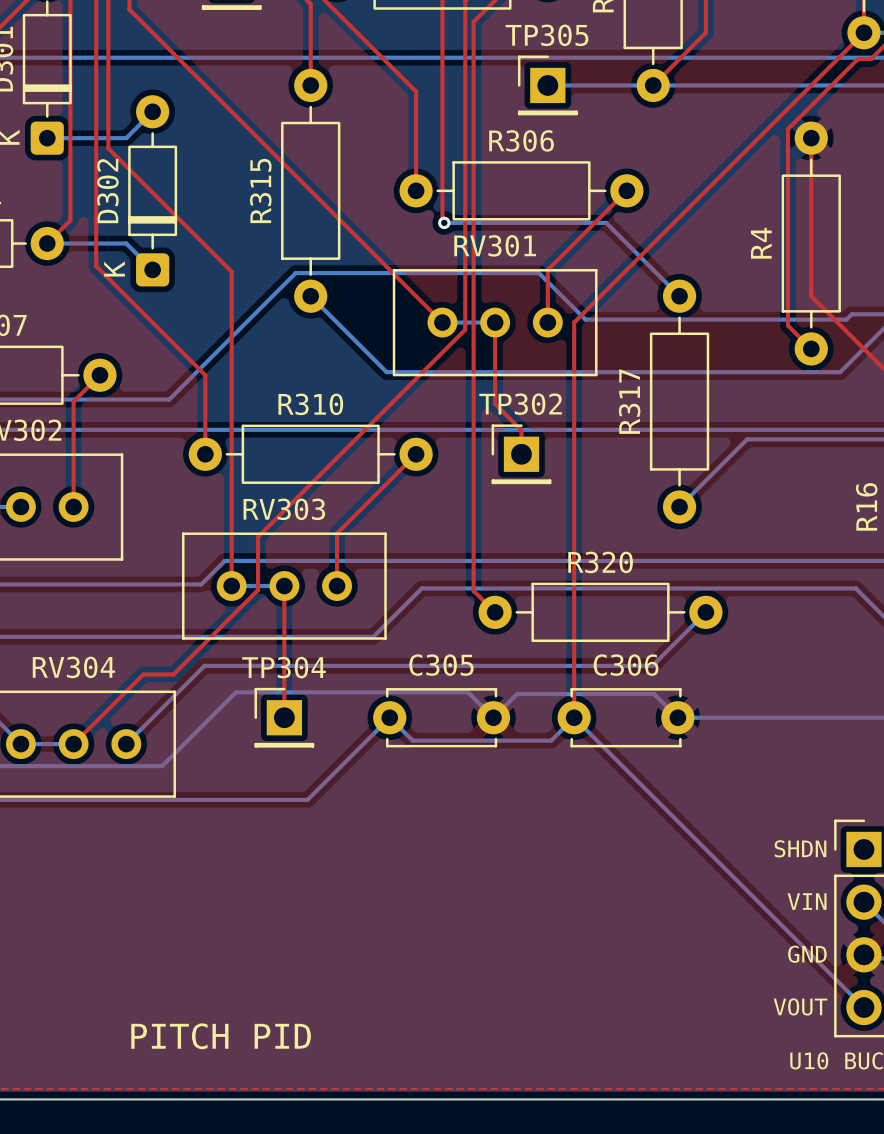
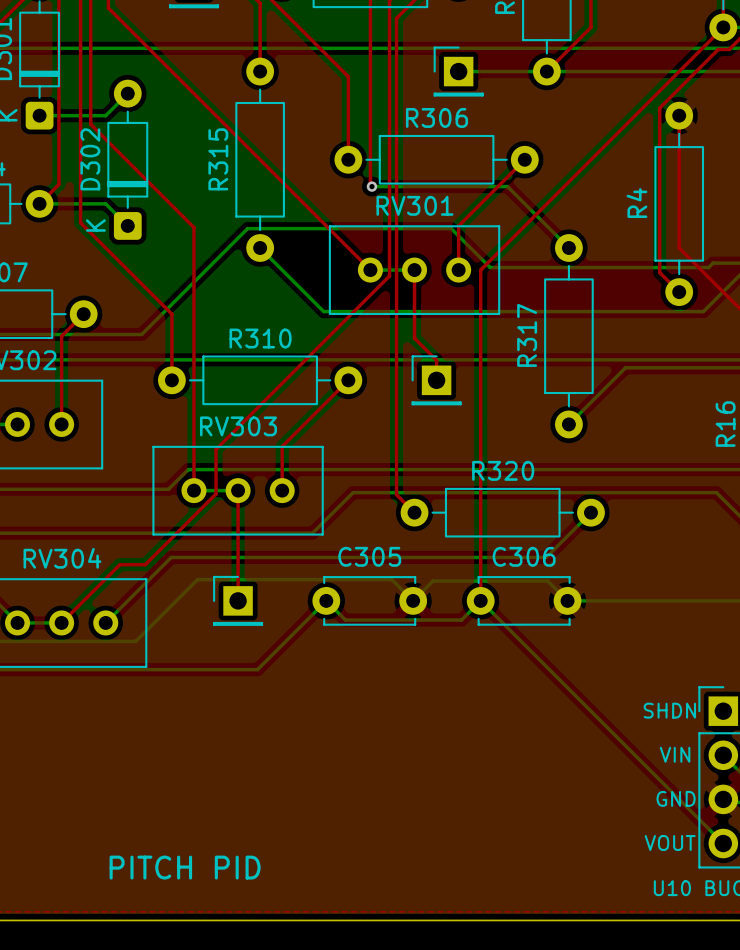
TP305 name: TP305 (547, 35) -> none
TP302 name: TP302 (520, 404) -> none
TP304 name: TP304 (284, 667) -> none

